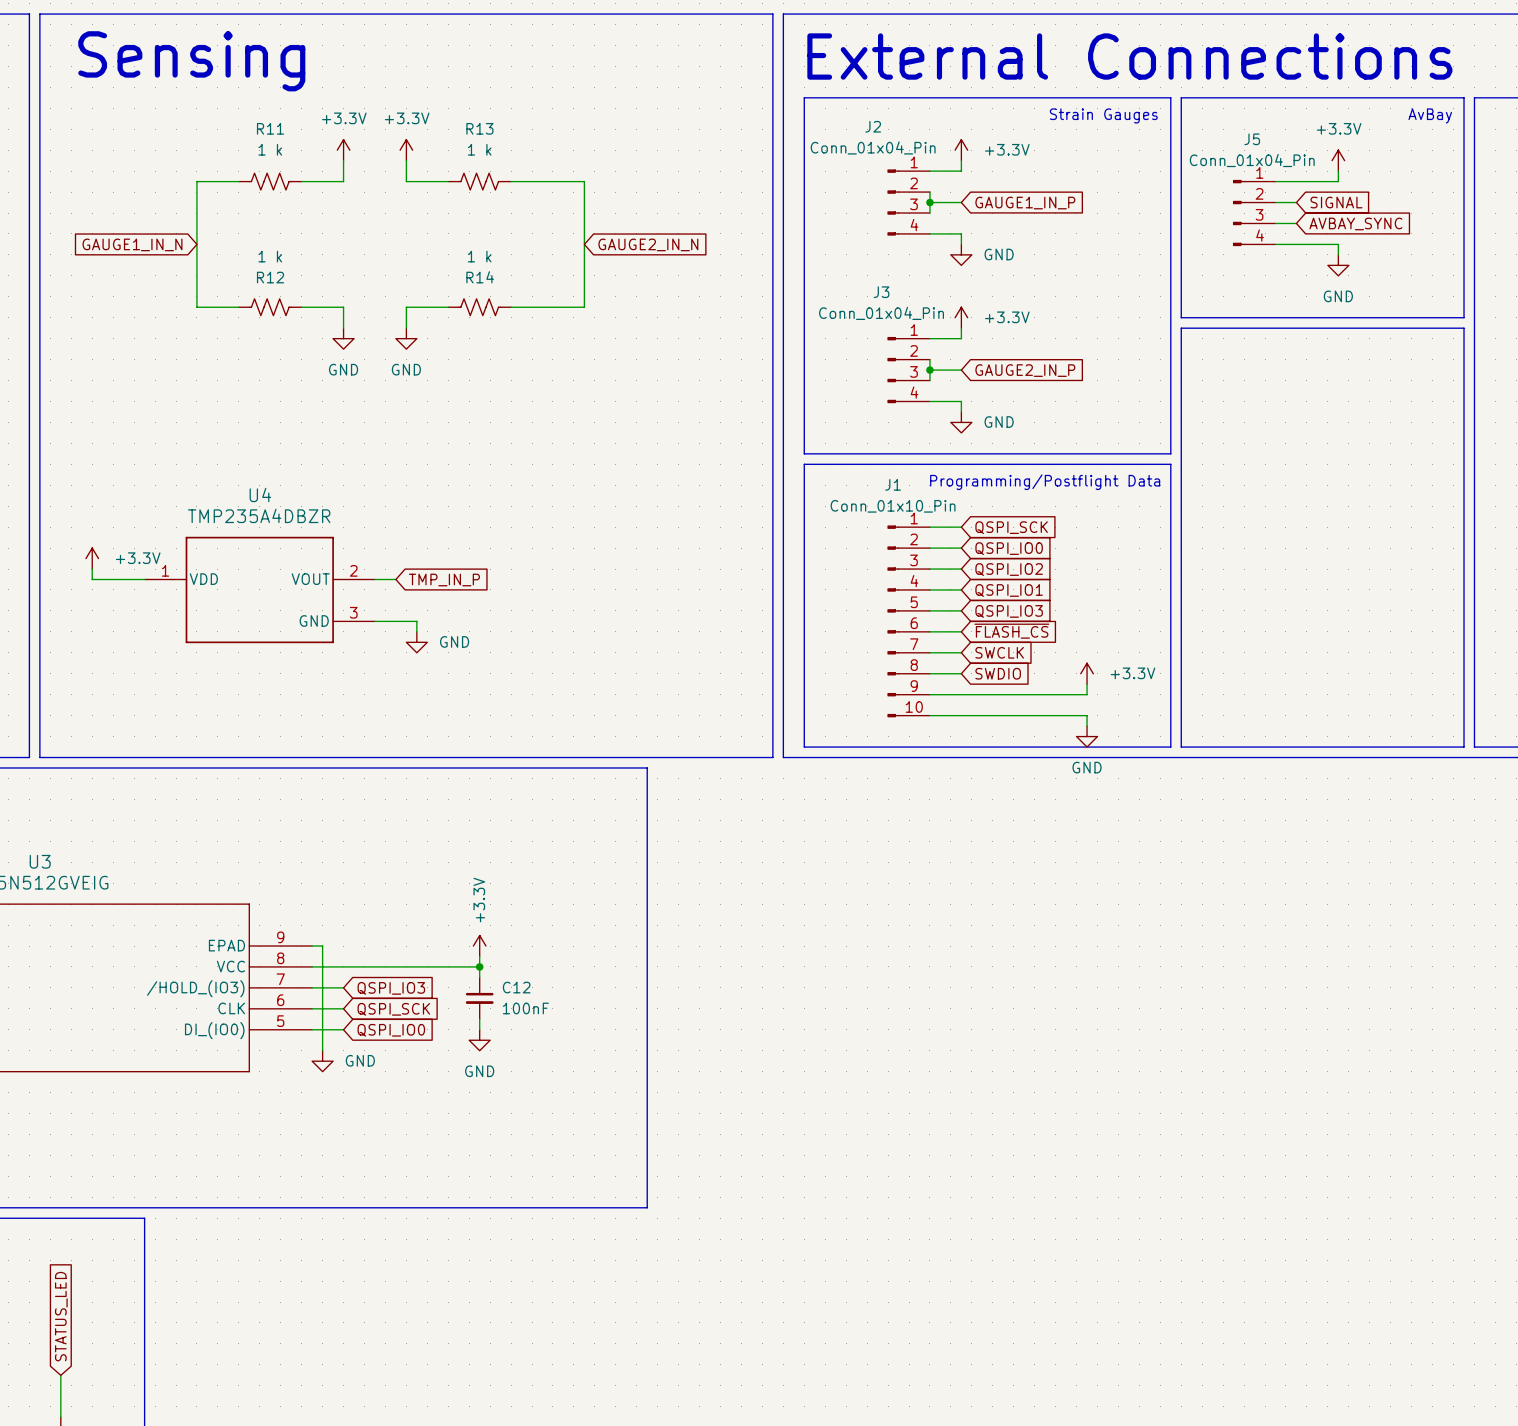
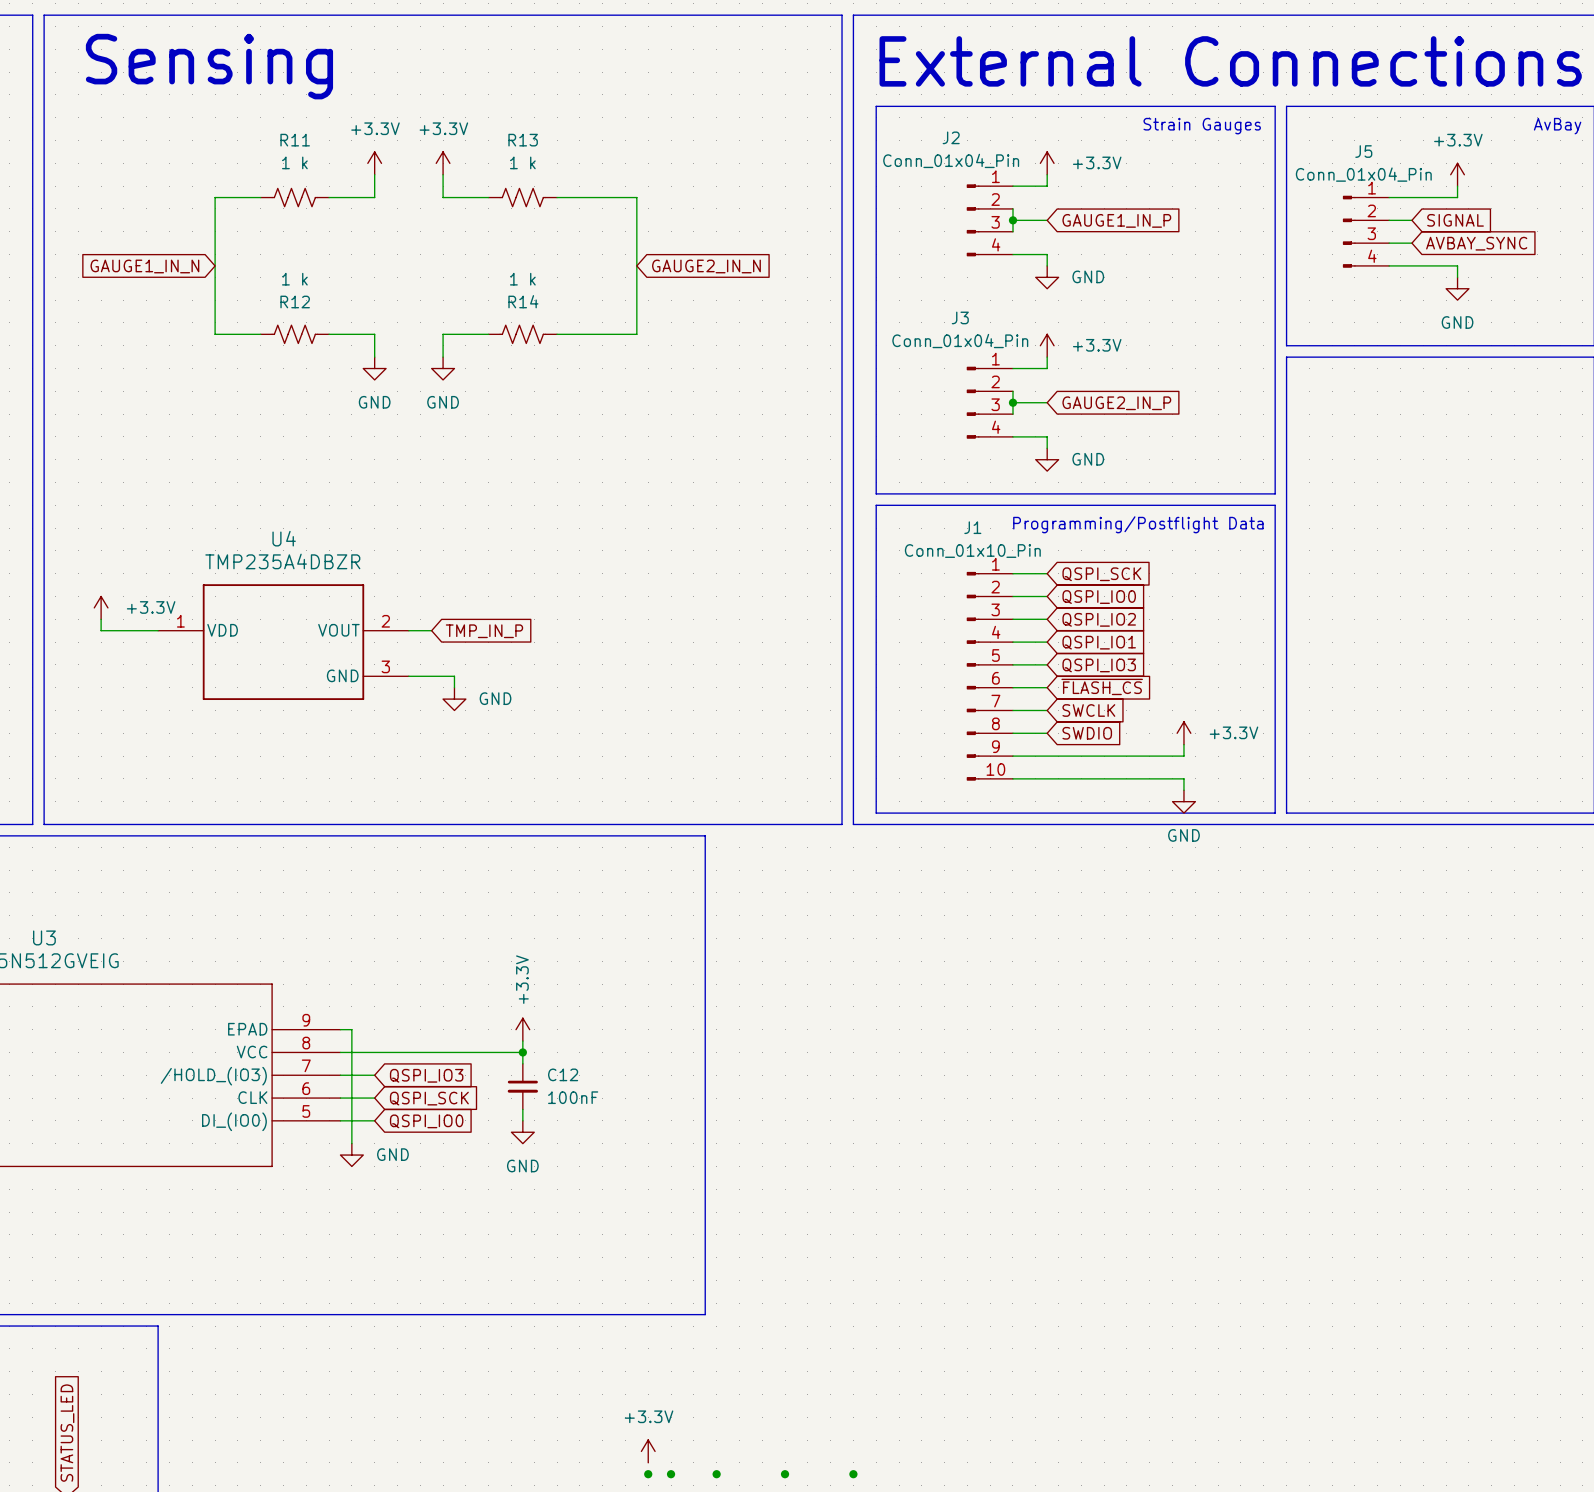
power symbol: none -> +3.3V (648, 1451)
junction: none -> (648, 1474)
junction: none -> (671, 1474)
junction: none -> (716, 1474)
junction: none -> (785, 1474)
junction: none -> (853, 1474)

